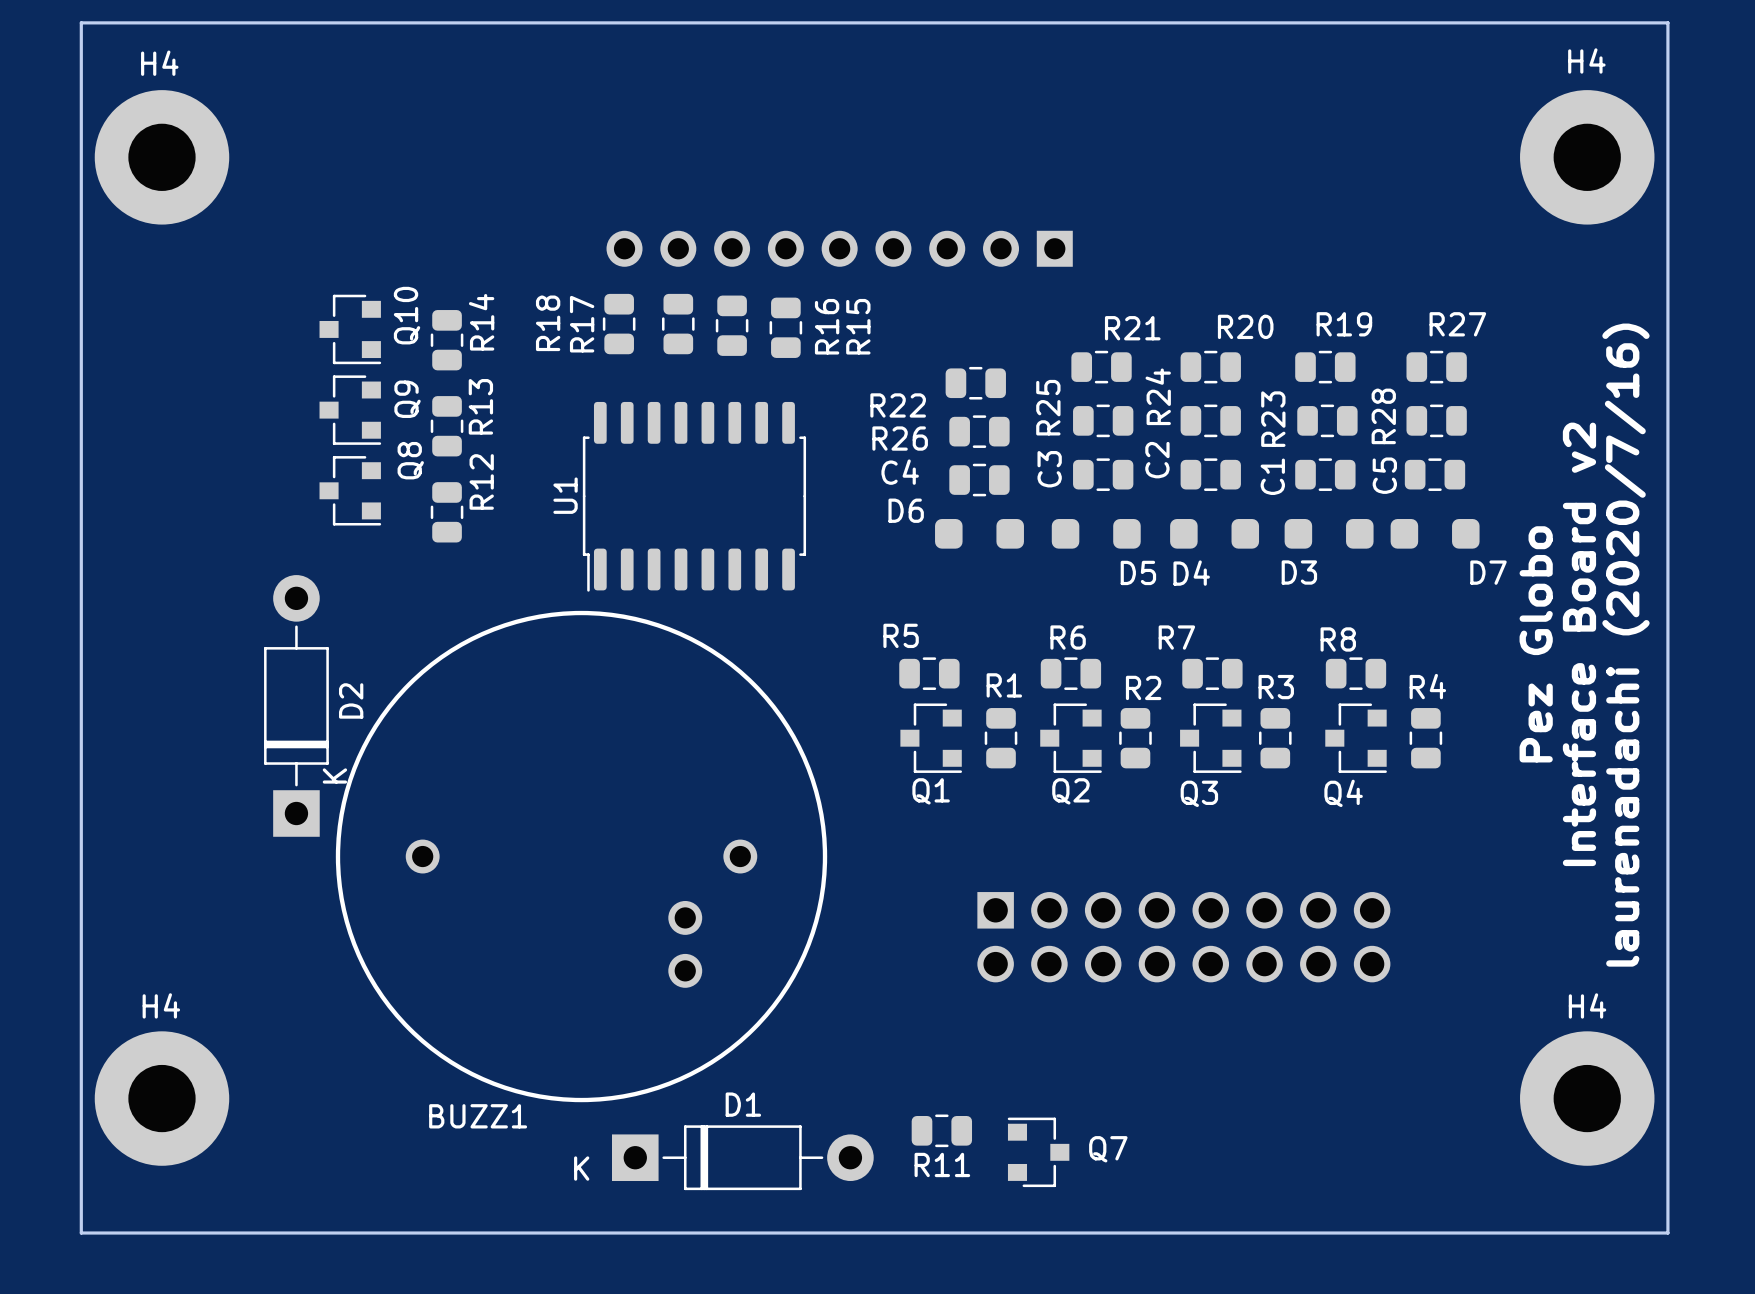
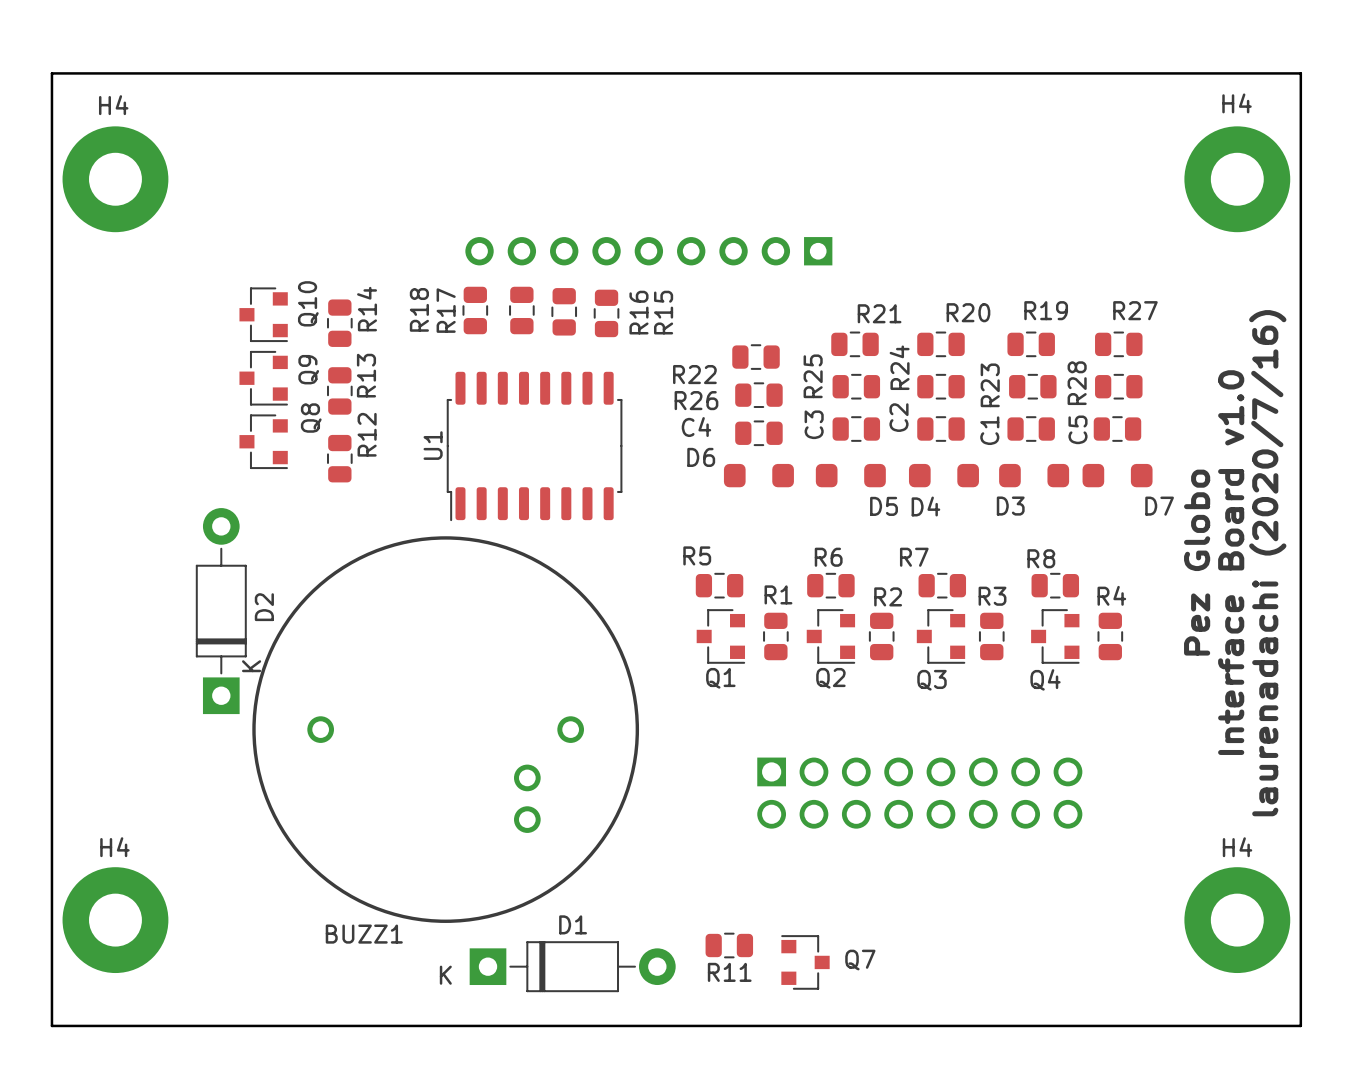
text: Interface Board v2 (1579, 644) -> Interface Board v1.0 (1231, 562)

